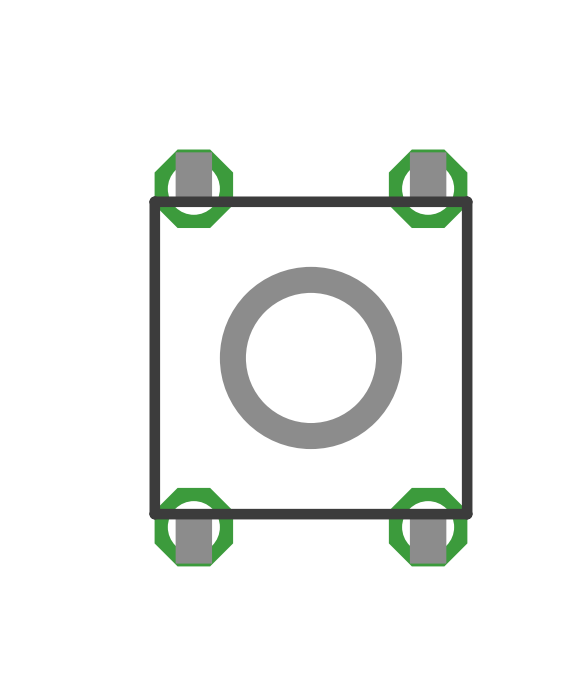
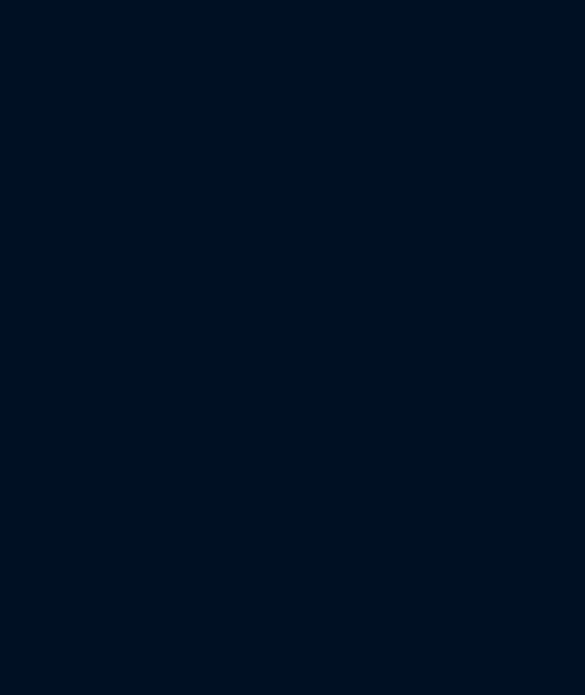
part: (310, 357) -> none

